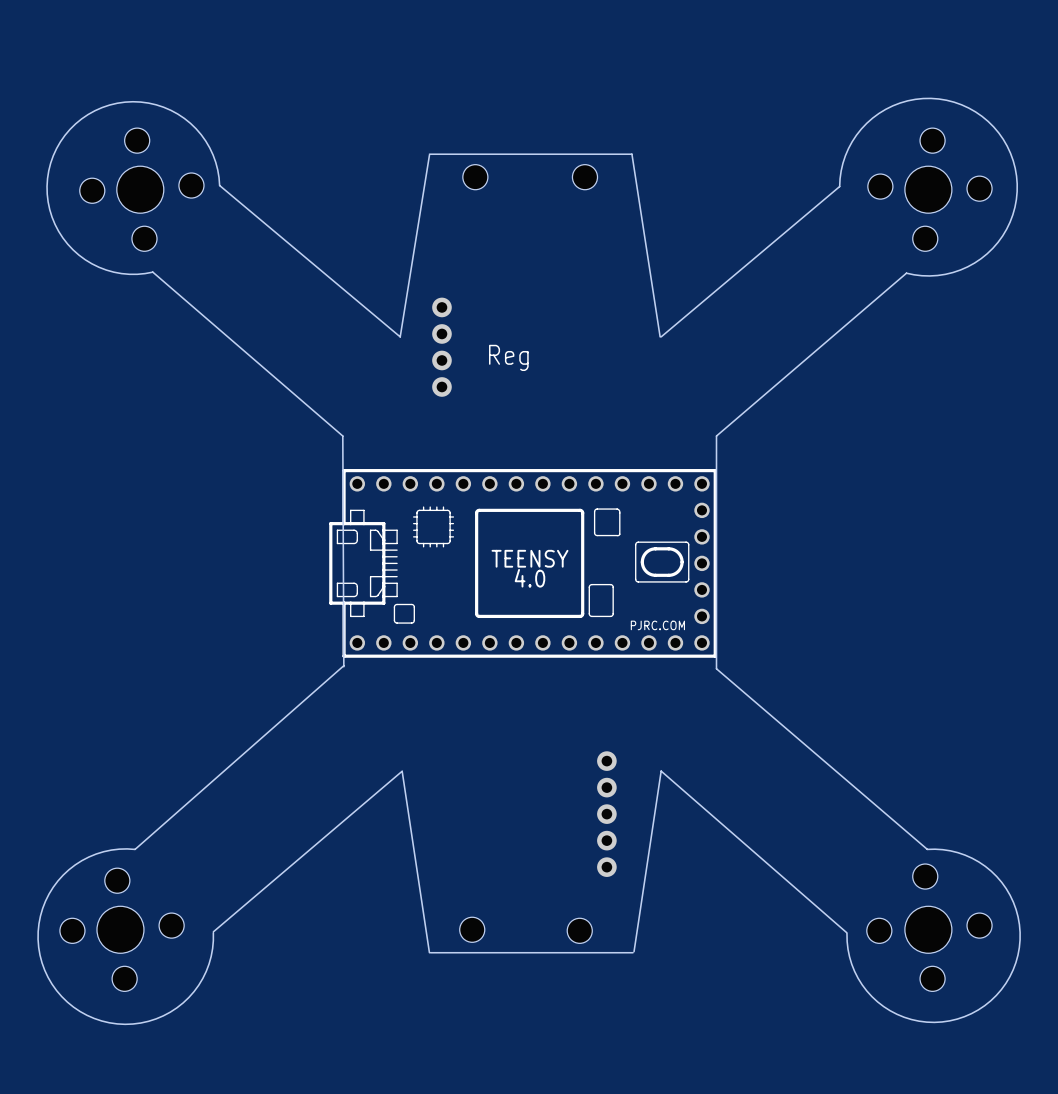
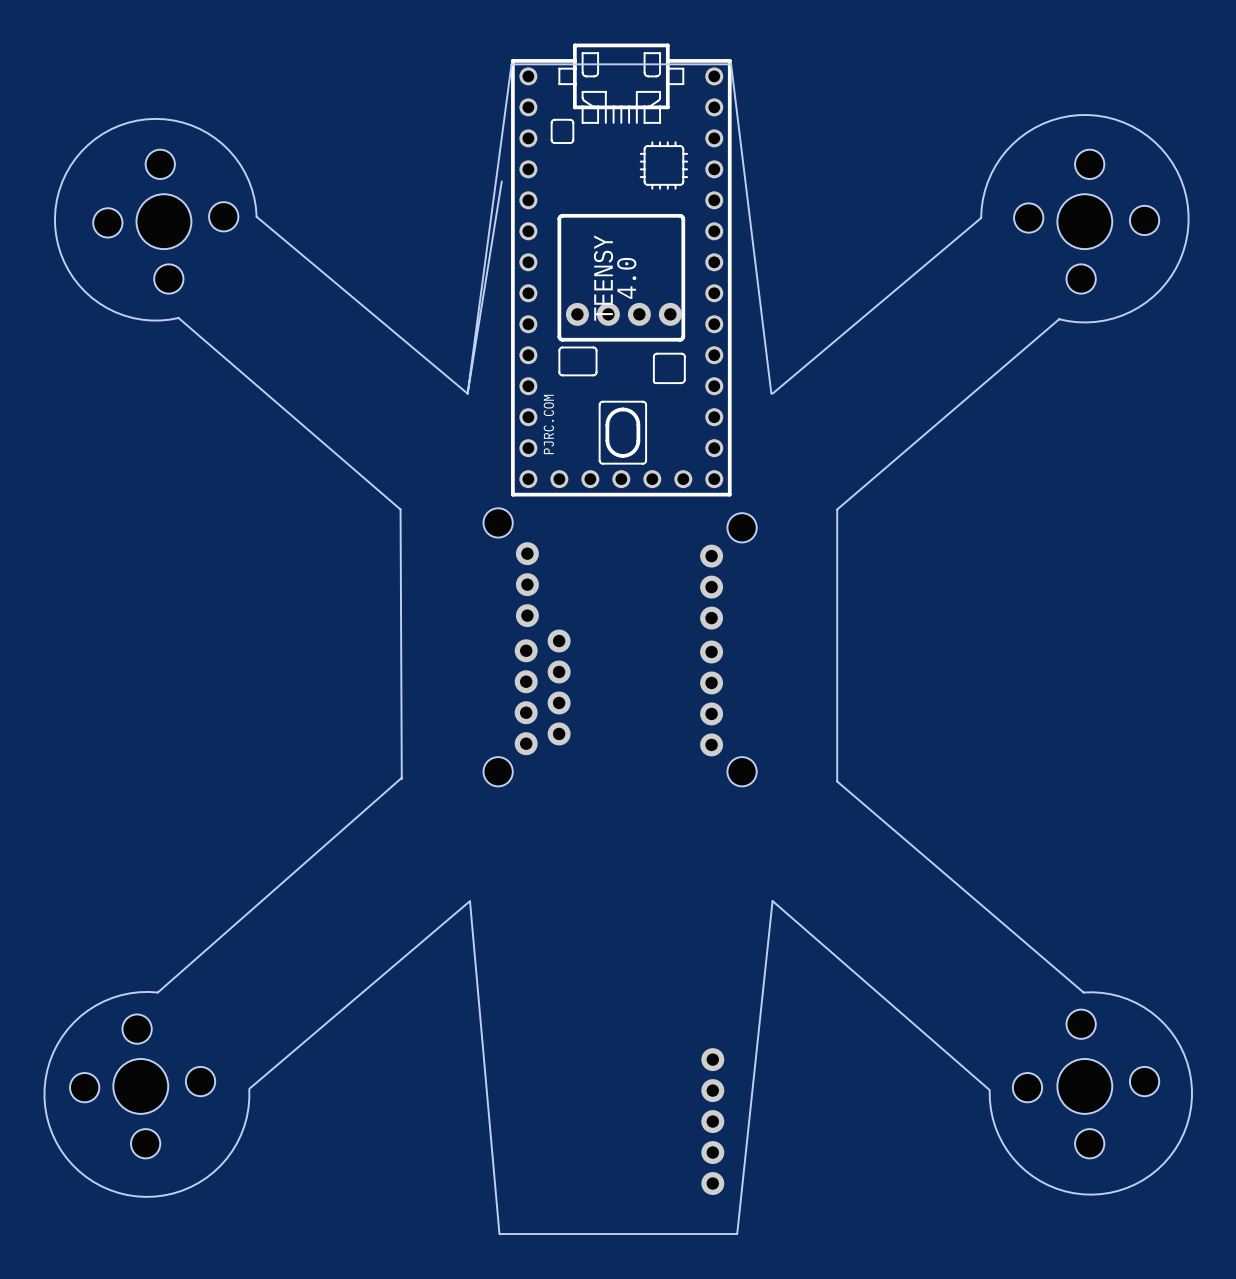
board edge: (429, 154) (631, 154) (660, 336) -> (467, 393) (511, 64) (731, 64) (771, 393)
hole: (475, 177) -> none
hole: (584, 177) -> none
part: none -> (621, 270)
part rotation: 0° (441, 347) -> 90° clockwise (623, 314)
part position: (441, 347) -> (623, 314)
text: Reg (508, 357) -> none
hole: none -> (498, 522)
hole: none -> (742, 527)
part: none -> (527, 584)
part: none -> (711, 587)
part: (523, 563) -> none
part: none -> (559, 687)
part: none -> (526, 697)
part: none -> (711, 698)
hole: none -> (498, 771)
hole: none -> (742, 771)
board edge: (661, 771) (634, 951) -> (772, 901) (737, 1234)
board edge: (402, 772) (429, 952) -> (470, 902) (499, 1232)
part position: (606, 814) -> (712, 1121)
hole: (472, 929) -> none
hole: (579, 930) -> none
board edge: (632, 952) (430, 952) -> (735, 1234) (499, 1234)

